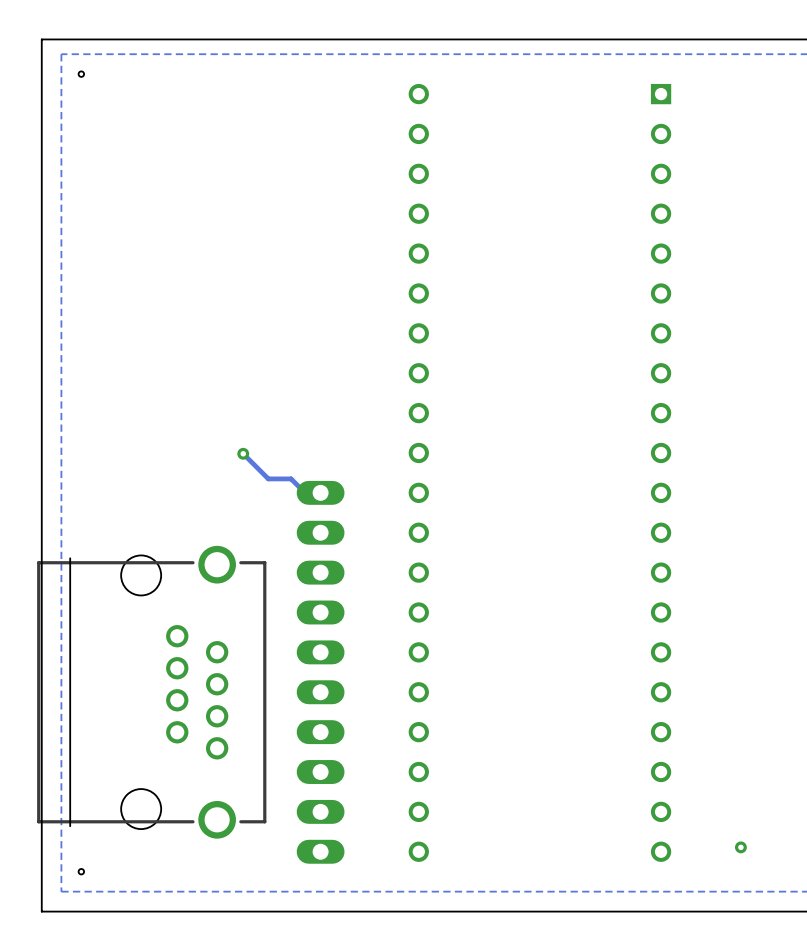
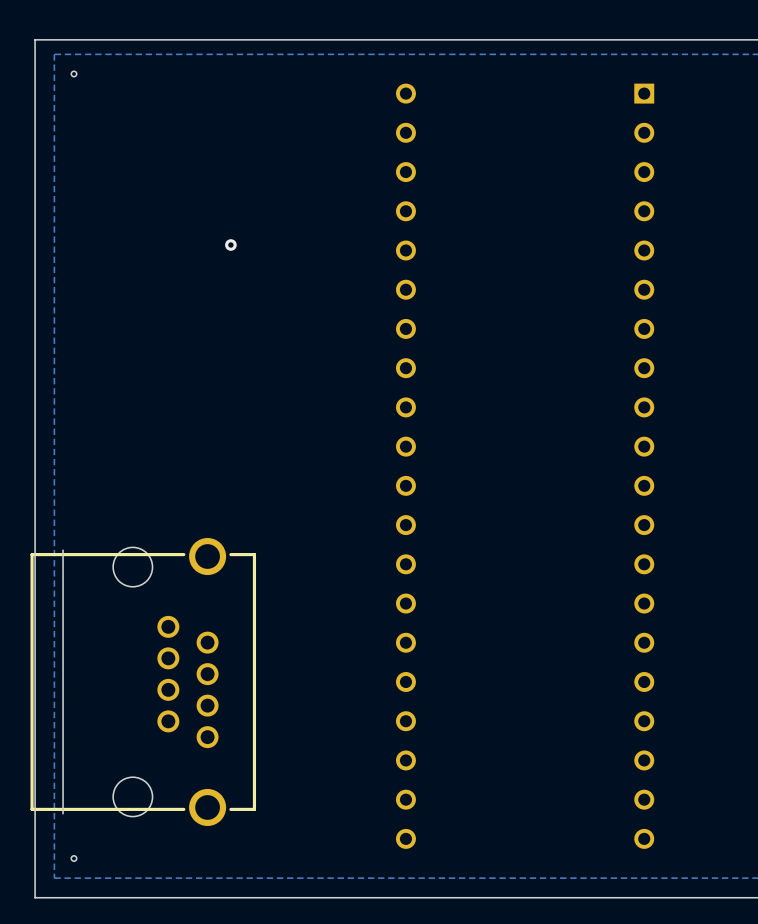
via: none -> (230, 245)
track: (243, 453) (268, 478) (291, 478) (304, 492) (320, 492) -> none
via: (243, 453) -> none
part: (320, 672) -> none
via: (740, 847) -> none

